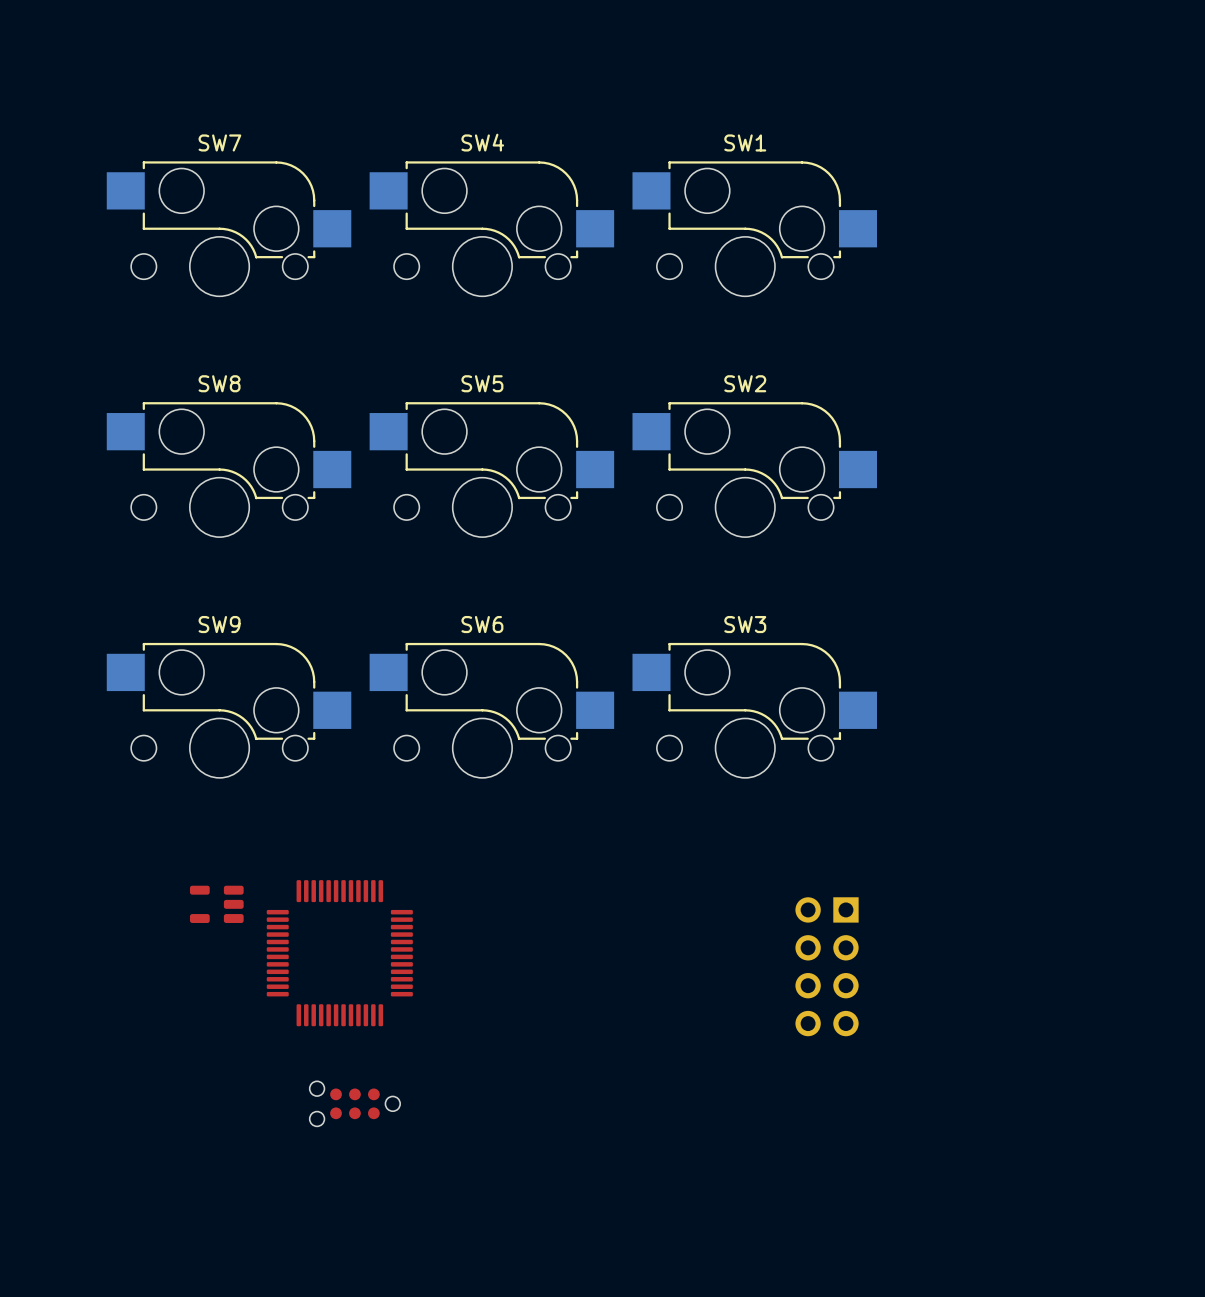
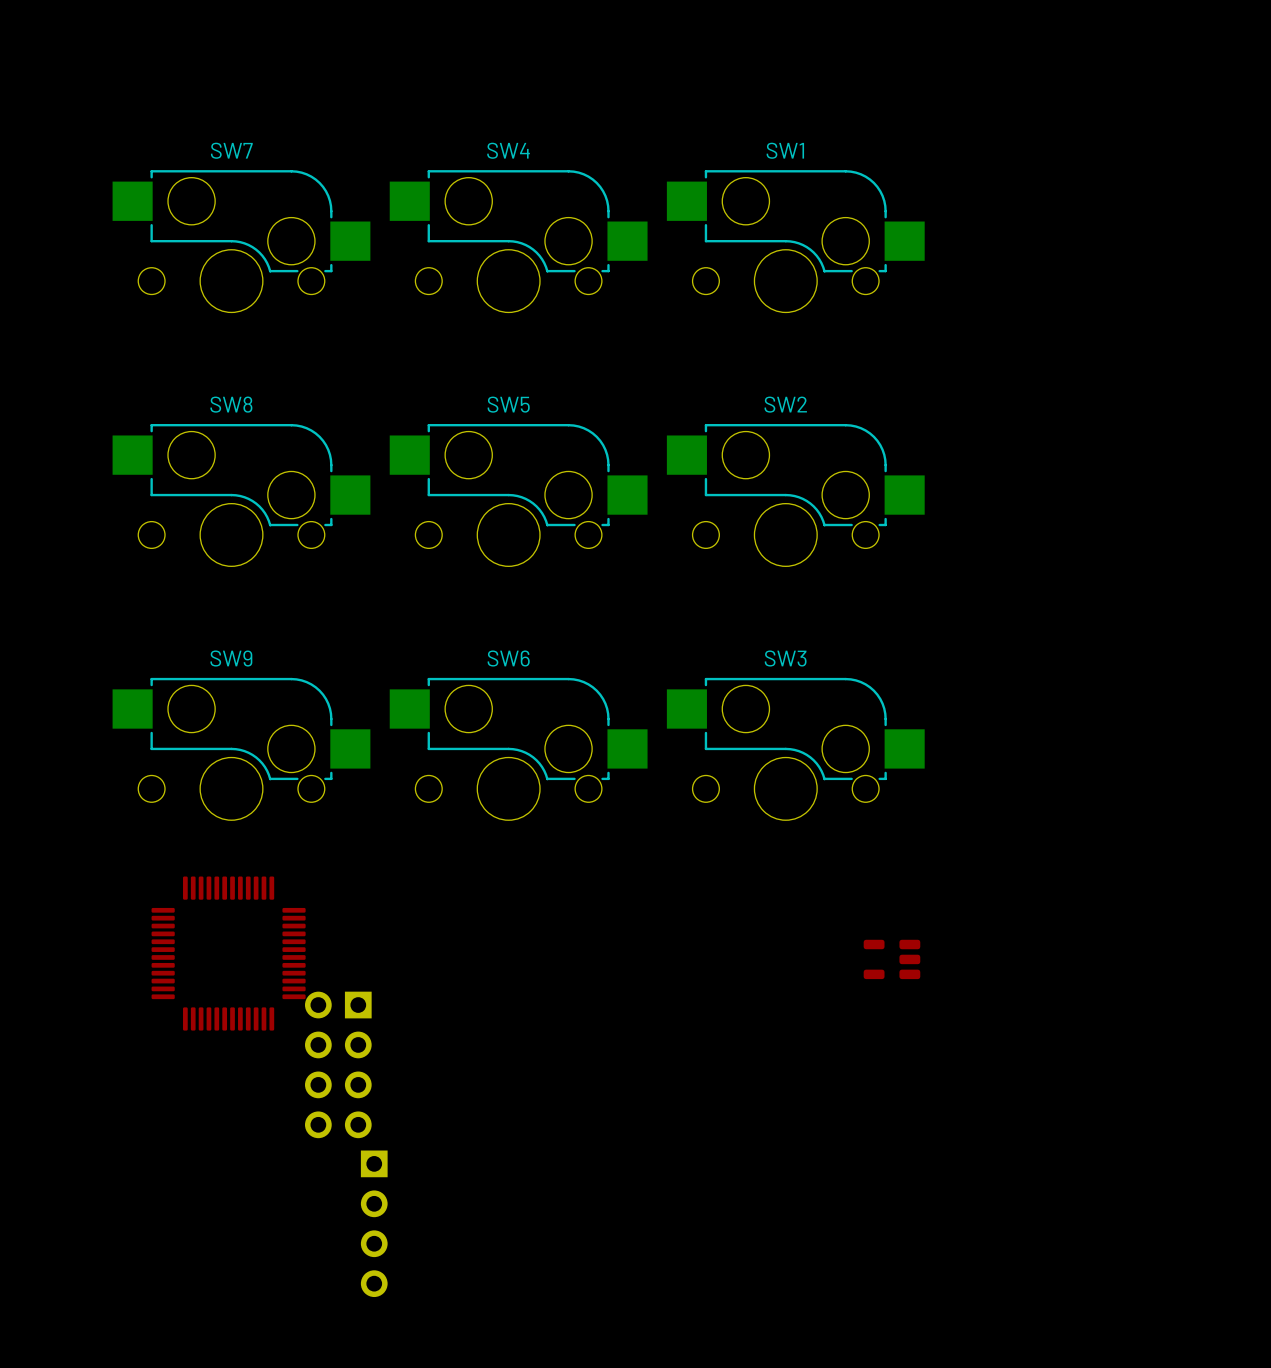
part footprint: [189, 885, 244, 923] -> [151, 876, 306, 1031]
part: none -> (891, 959)
part: (339, 953) -> none
part: (827, 966) -> none
part: none -> (338, 1064)
part: (354, 1103) -> none
part: none -> (374, 1223)

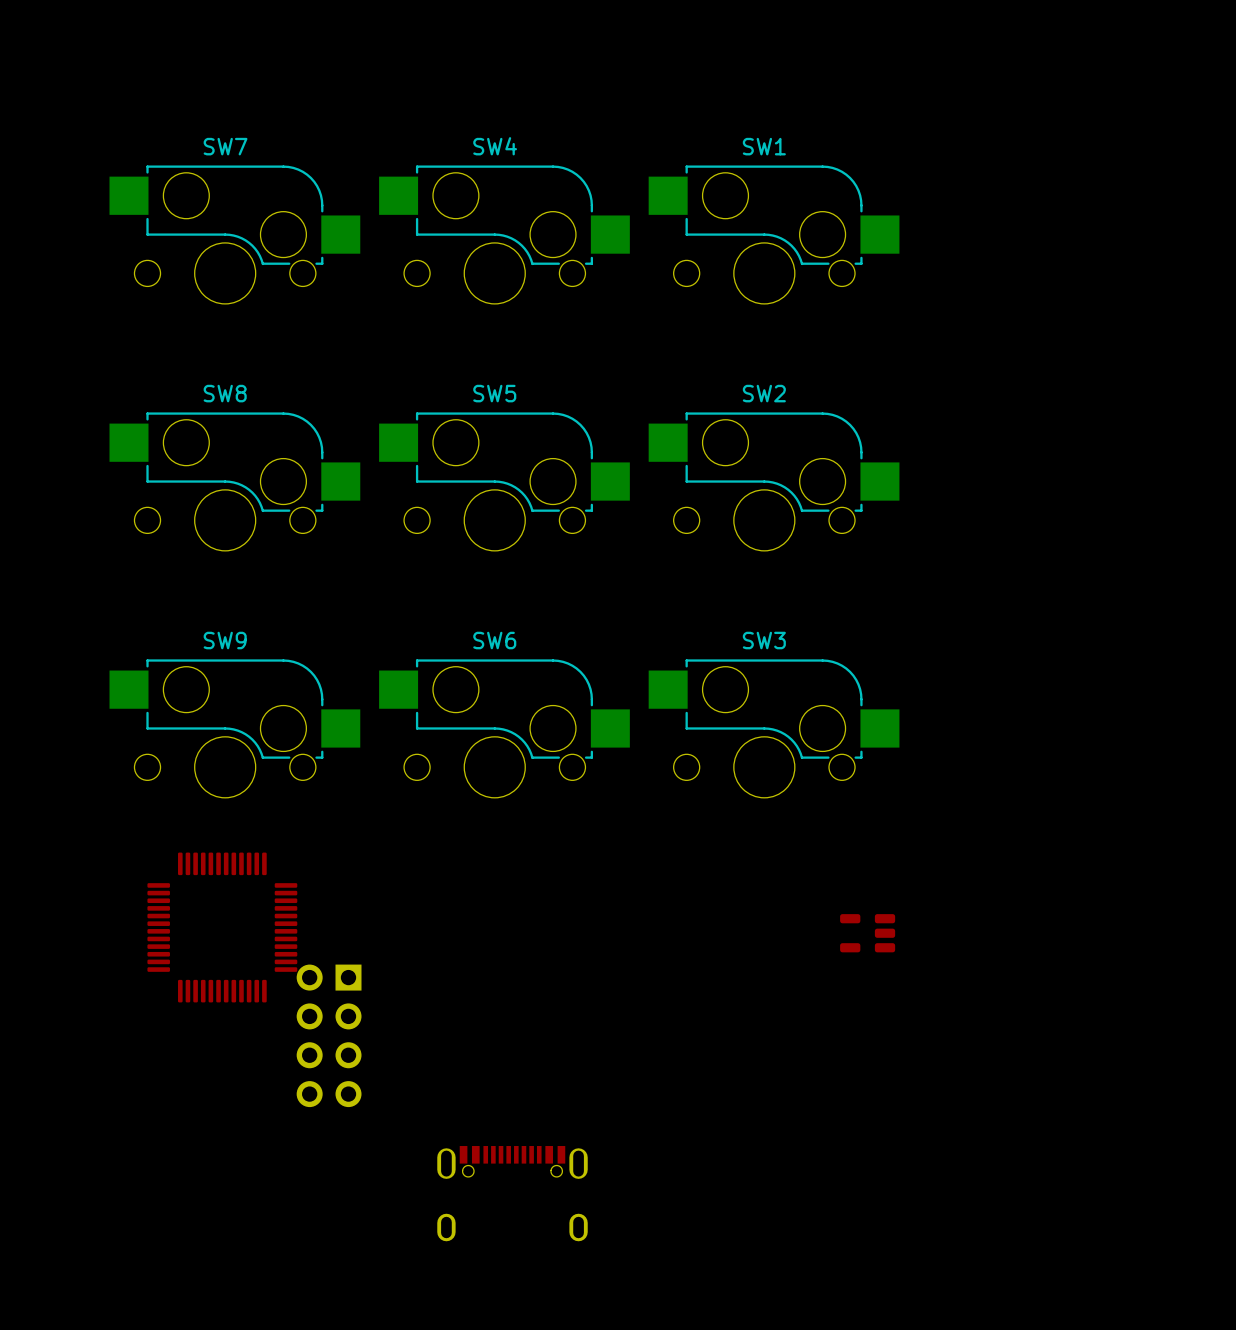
part: (374, 1223) -> none
part: none -> (512, 1193)

